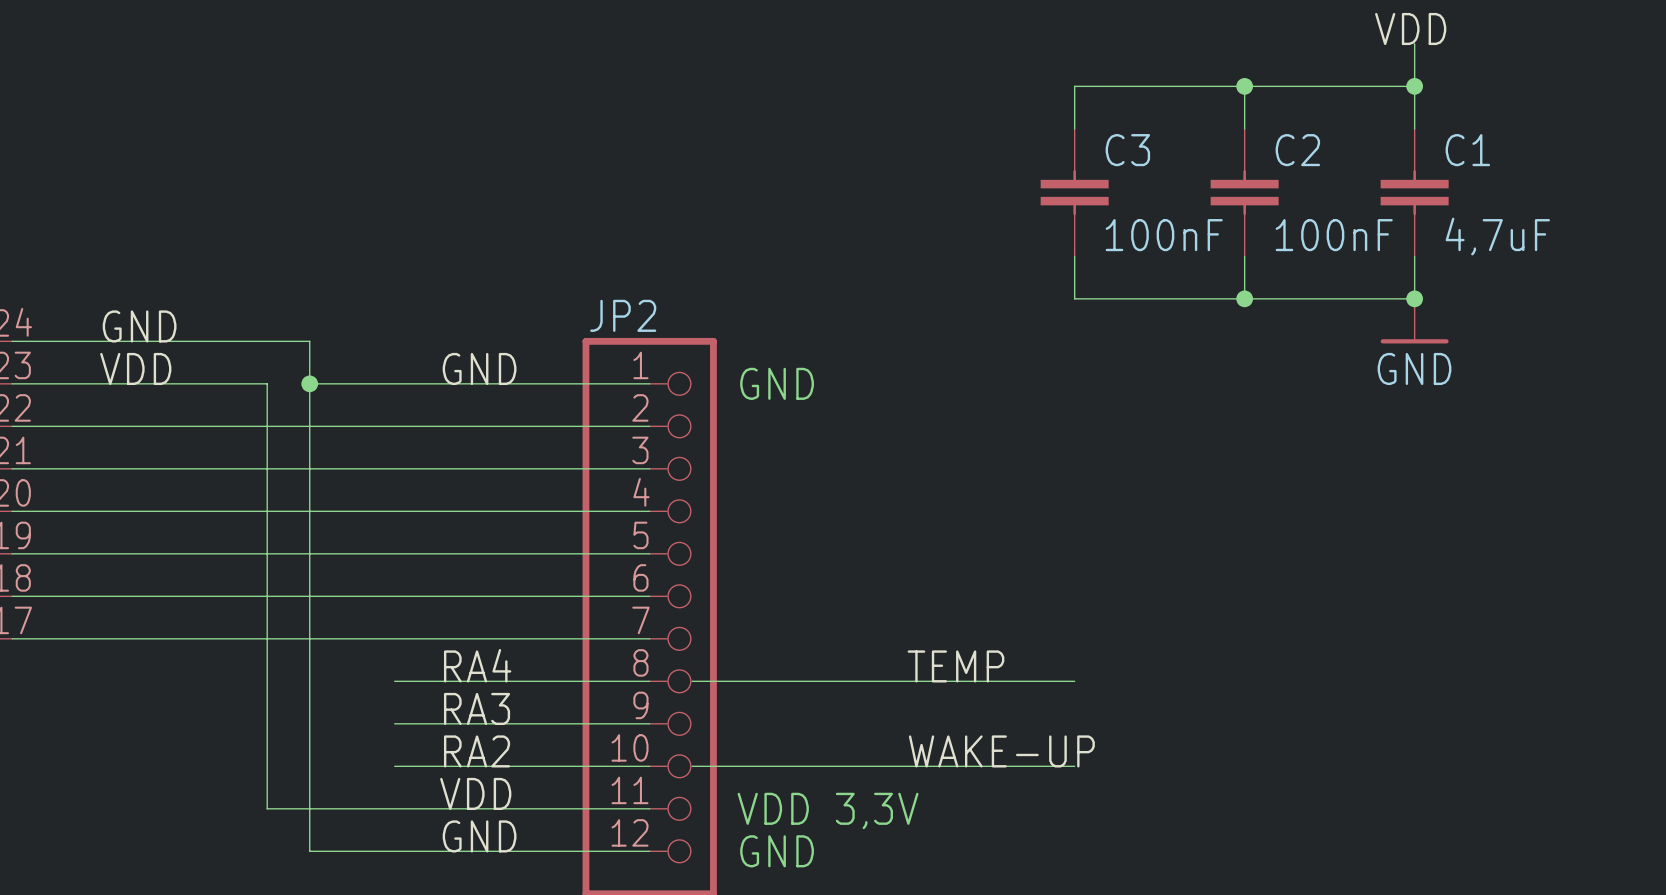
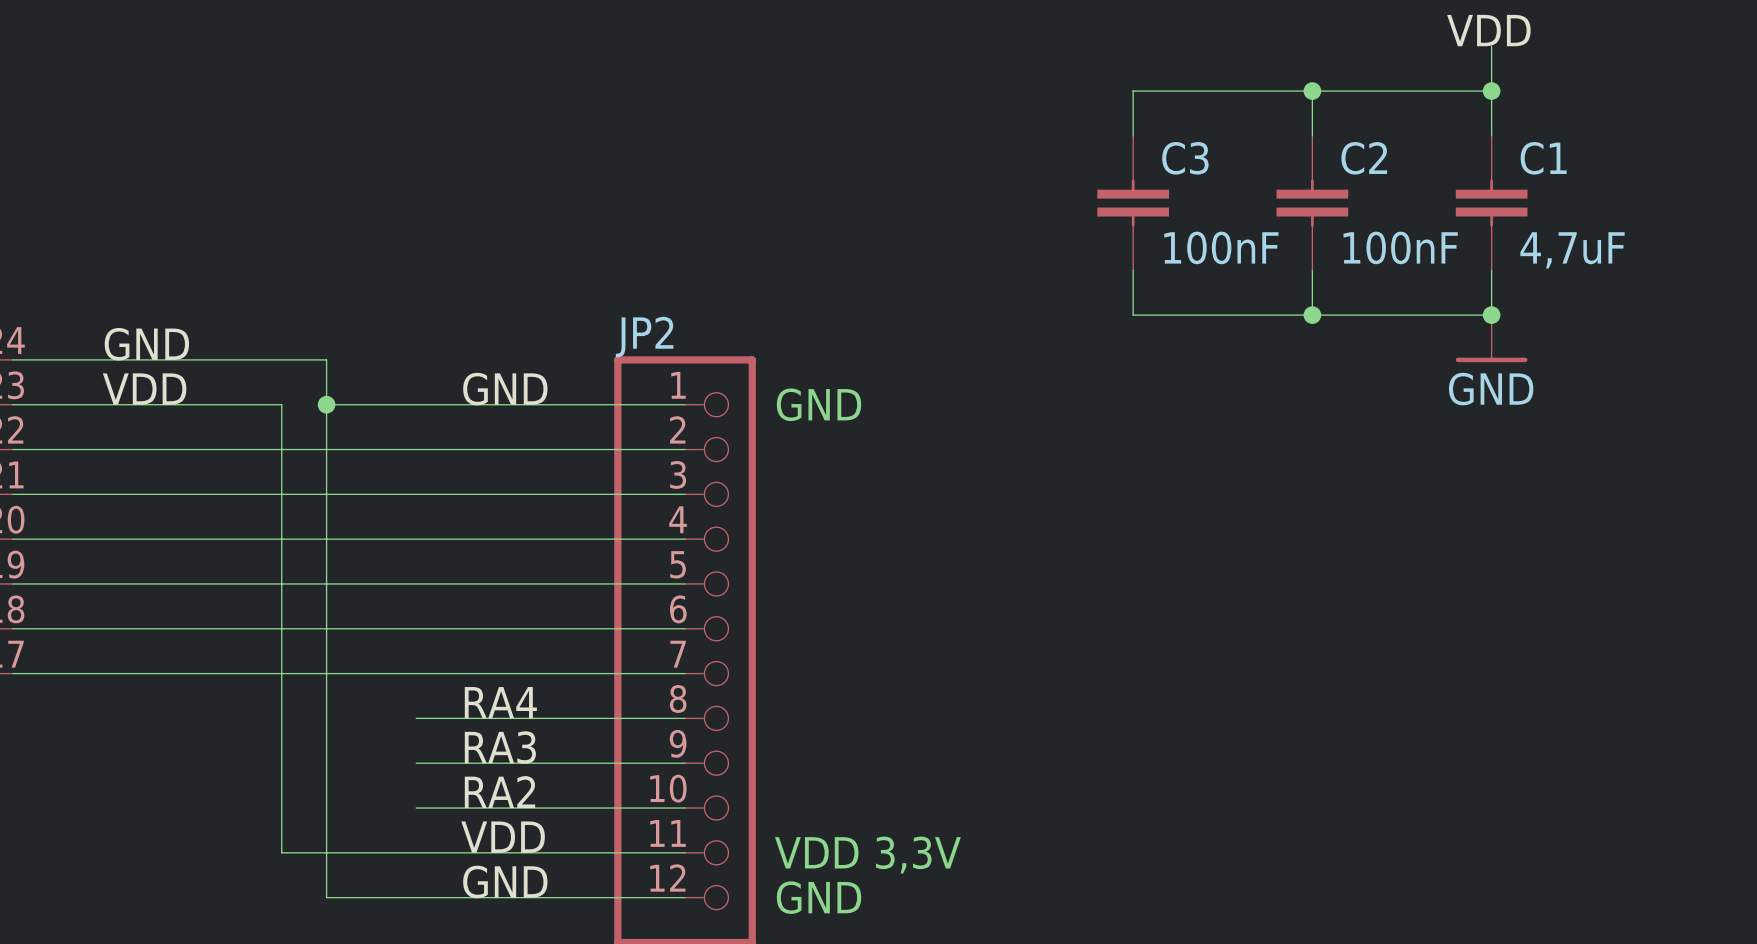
label: TEMP (955, 666) -> none
wire: (692, 681) (1074, 681) -> none
label: WAKE-UP (1001, 751) -> none
wire: (692, 766) (1074, 766) -> none

